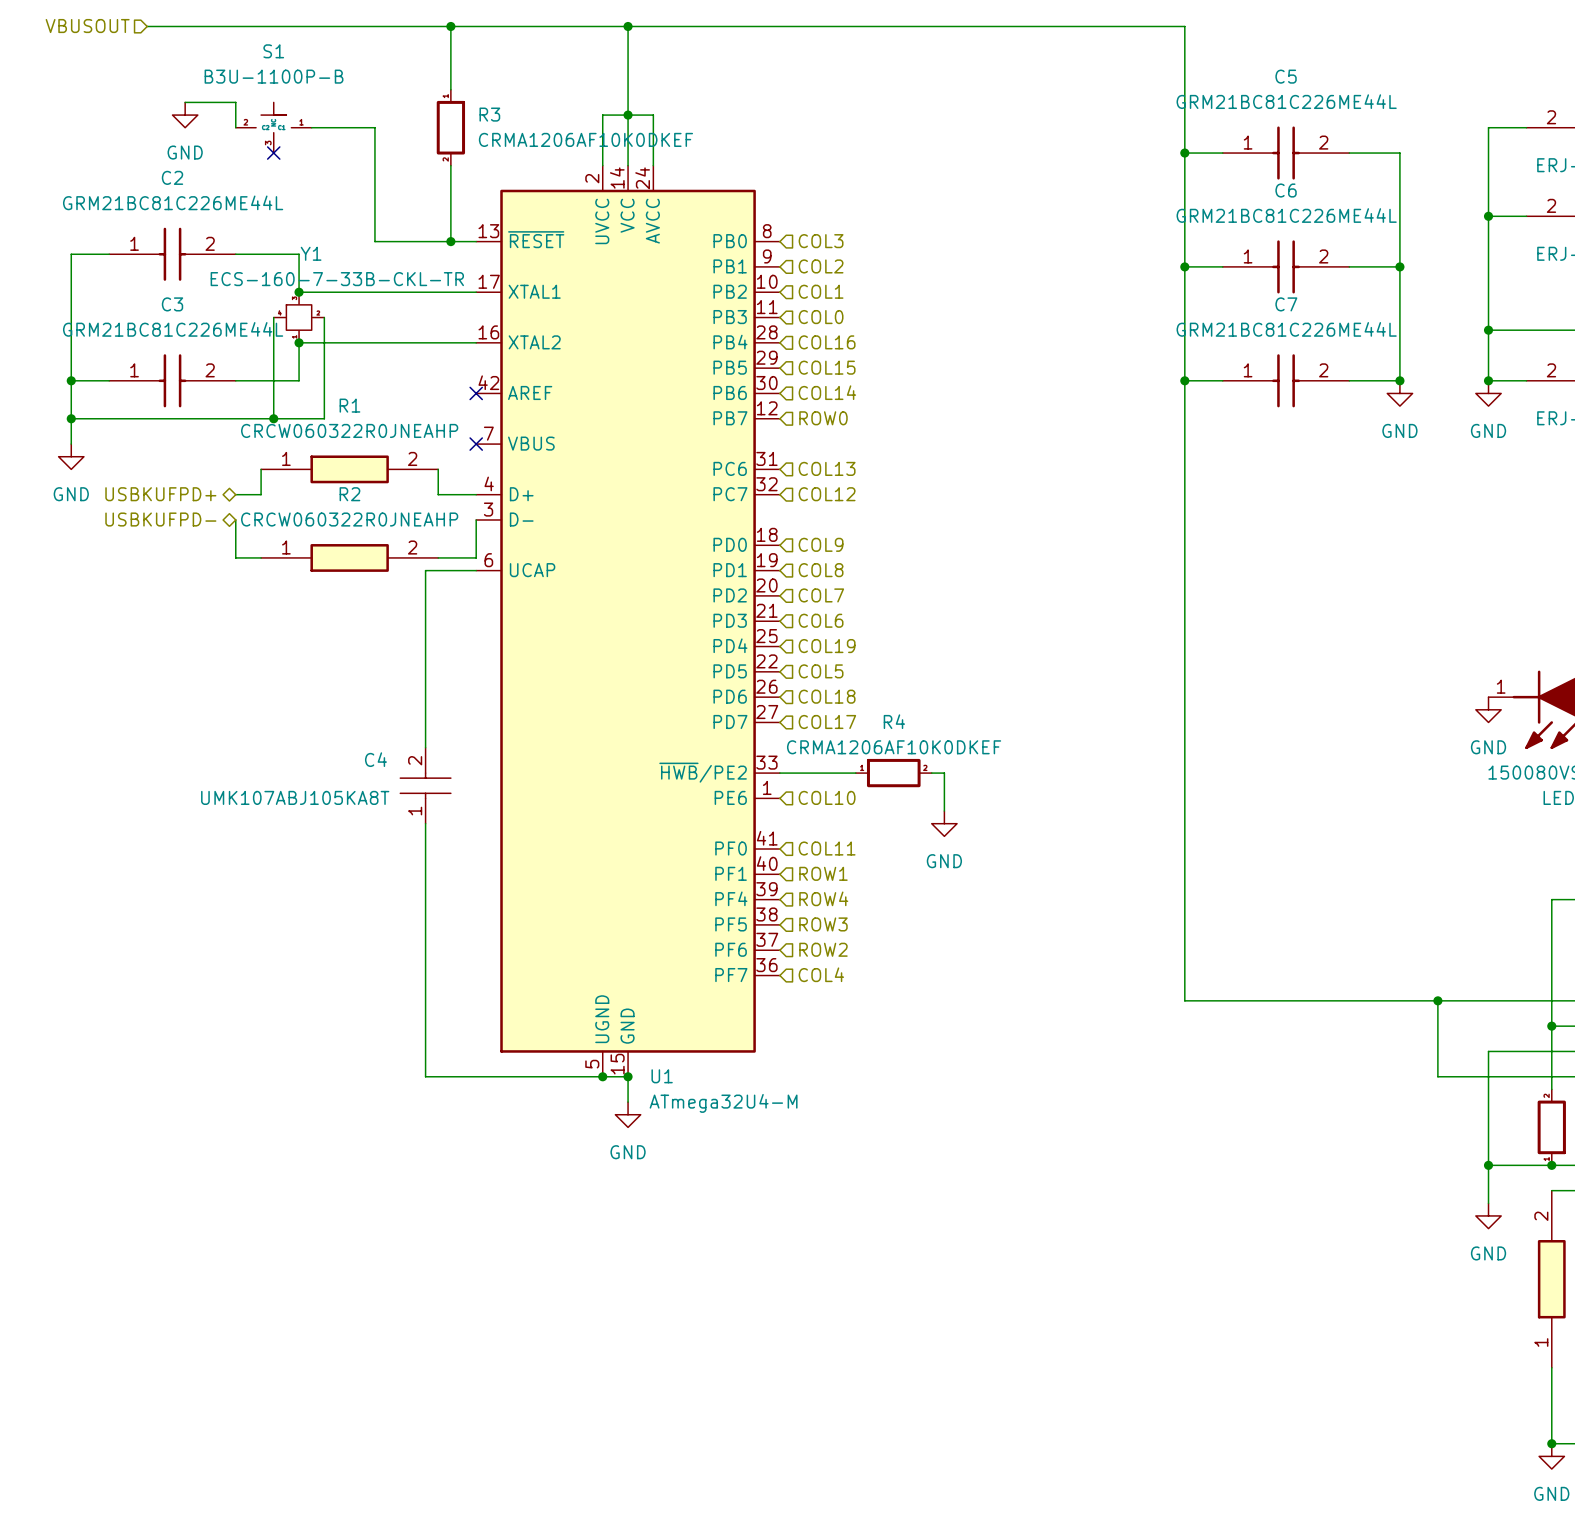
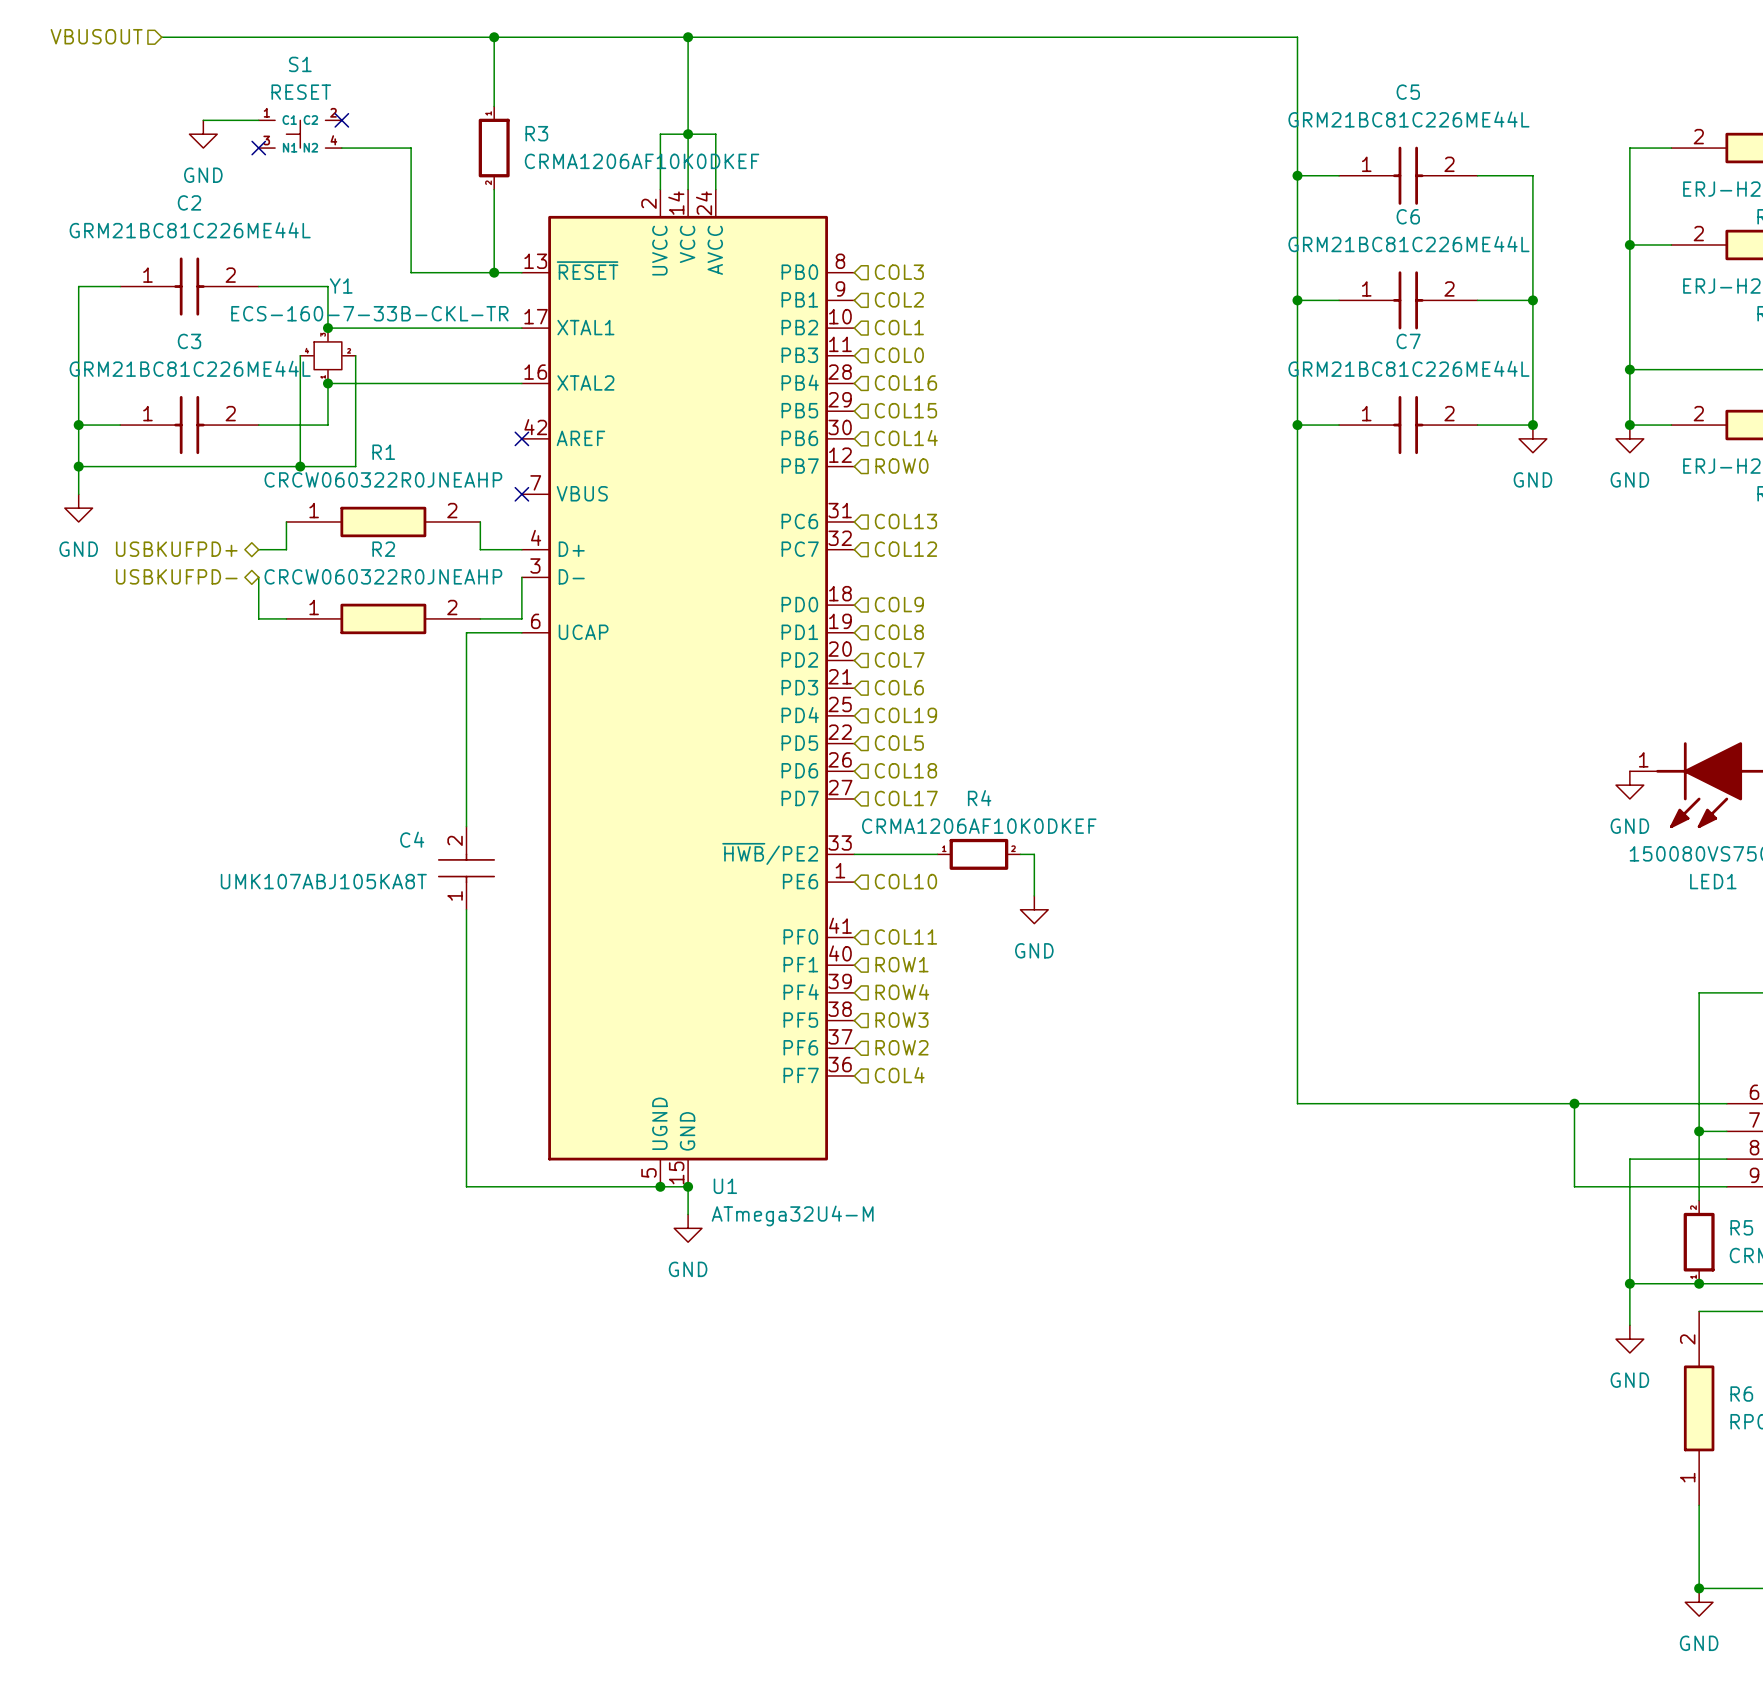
S1 value: B3U-1100P-B (274, 76) -> RESET (301, 92)
wire: (235, 102) (235, 127) -> none
S1 symbol: [235, 102, 312, 154] -> [258, 120, 342, 149]
no-connect mark: none -> (341, 120)
no-connect mark: none -> (258, 148)
no-connect mark: (273, 153) -> none

